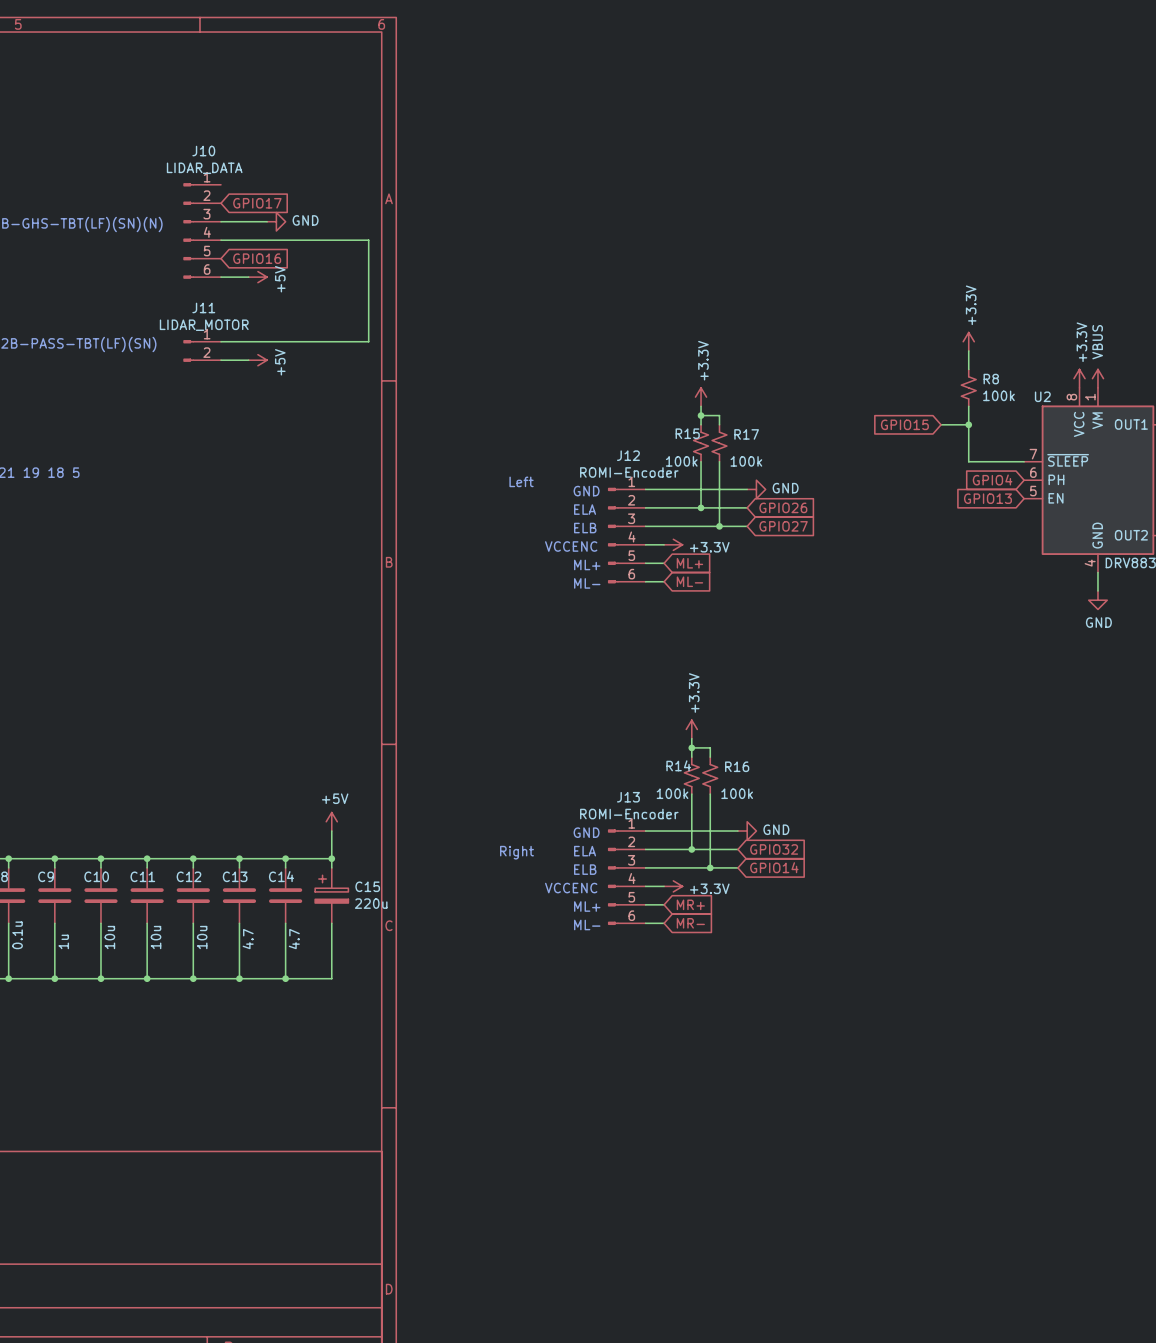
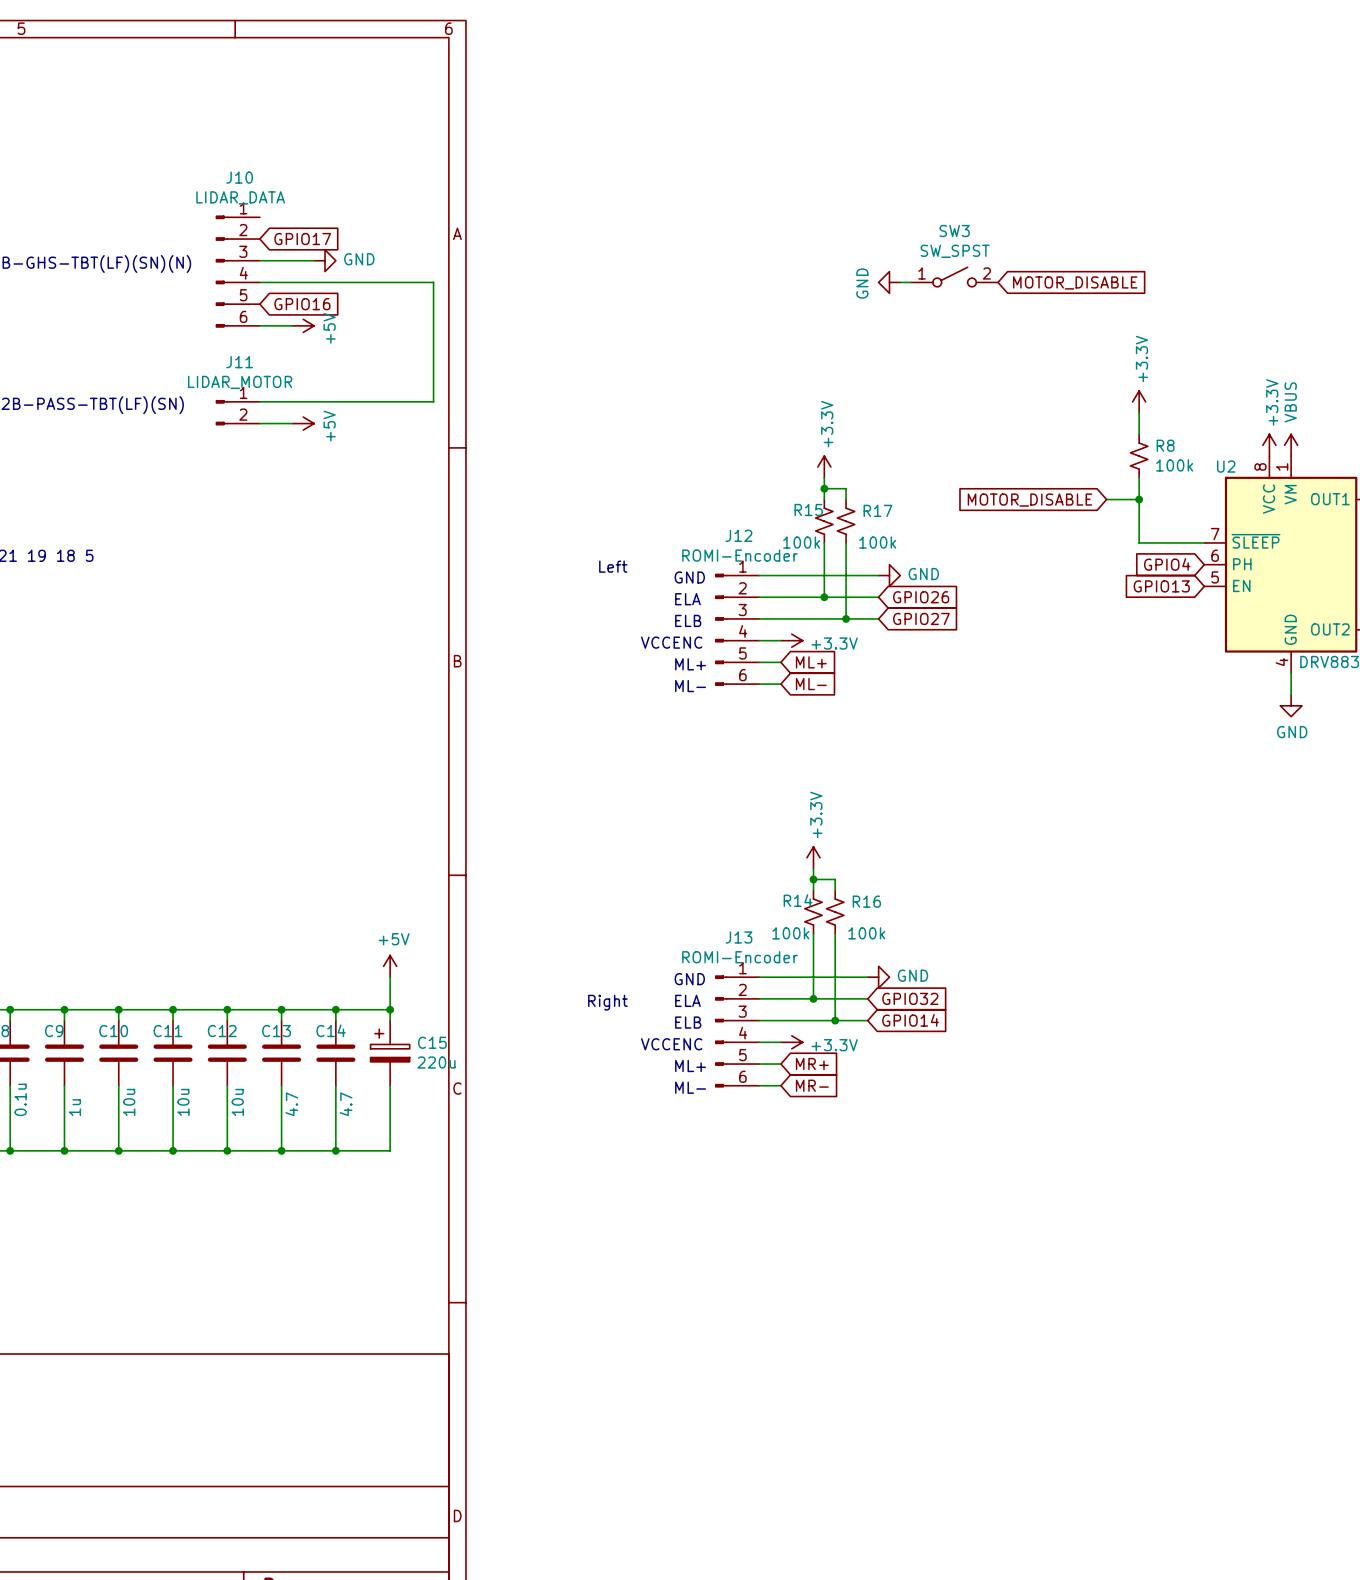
SW3: none -> SW_SPST (954, 277)
power symbol: none -> GND (889, 282)
wire: none -> (900, 282) (911, 282)
global label: none -> MOTOR_DISABLE (1075, 282)
global label: GPIO15 (904, 424) -> MOTOR_DISABLE (1029, 500)

